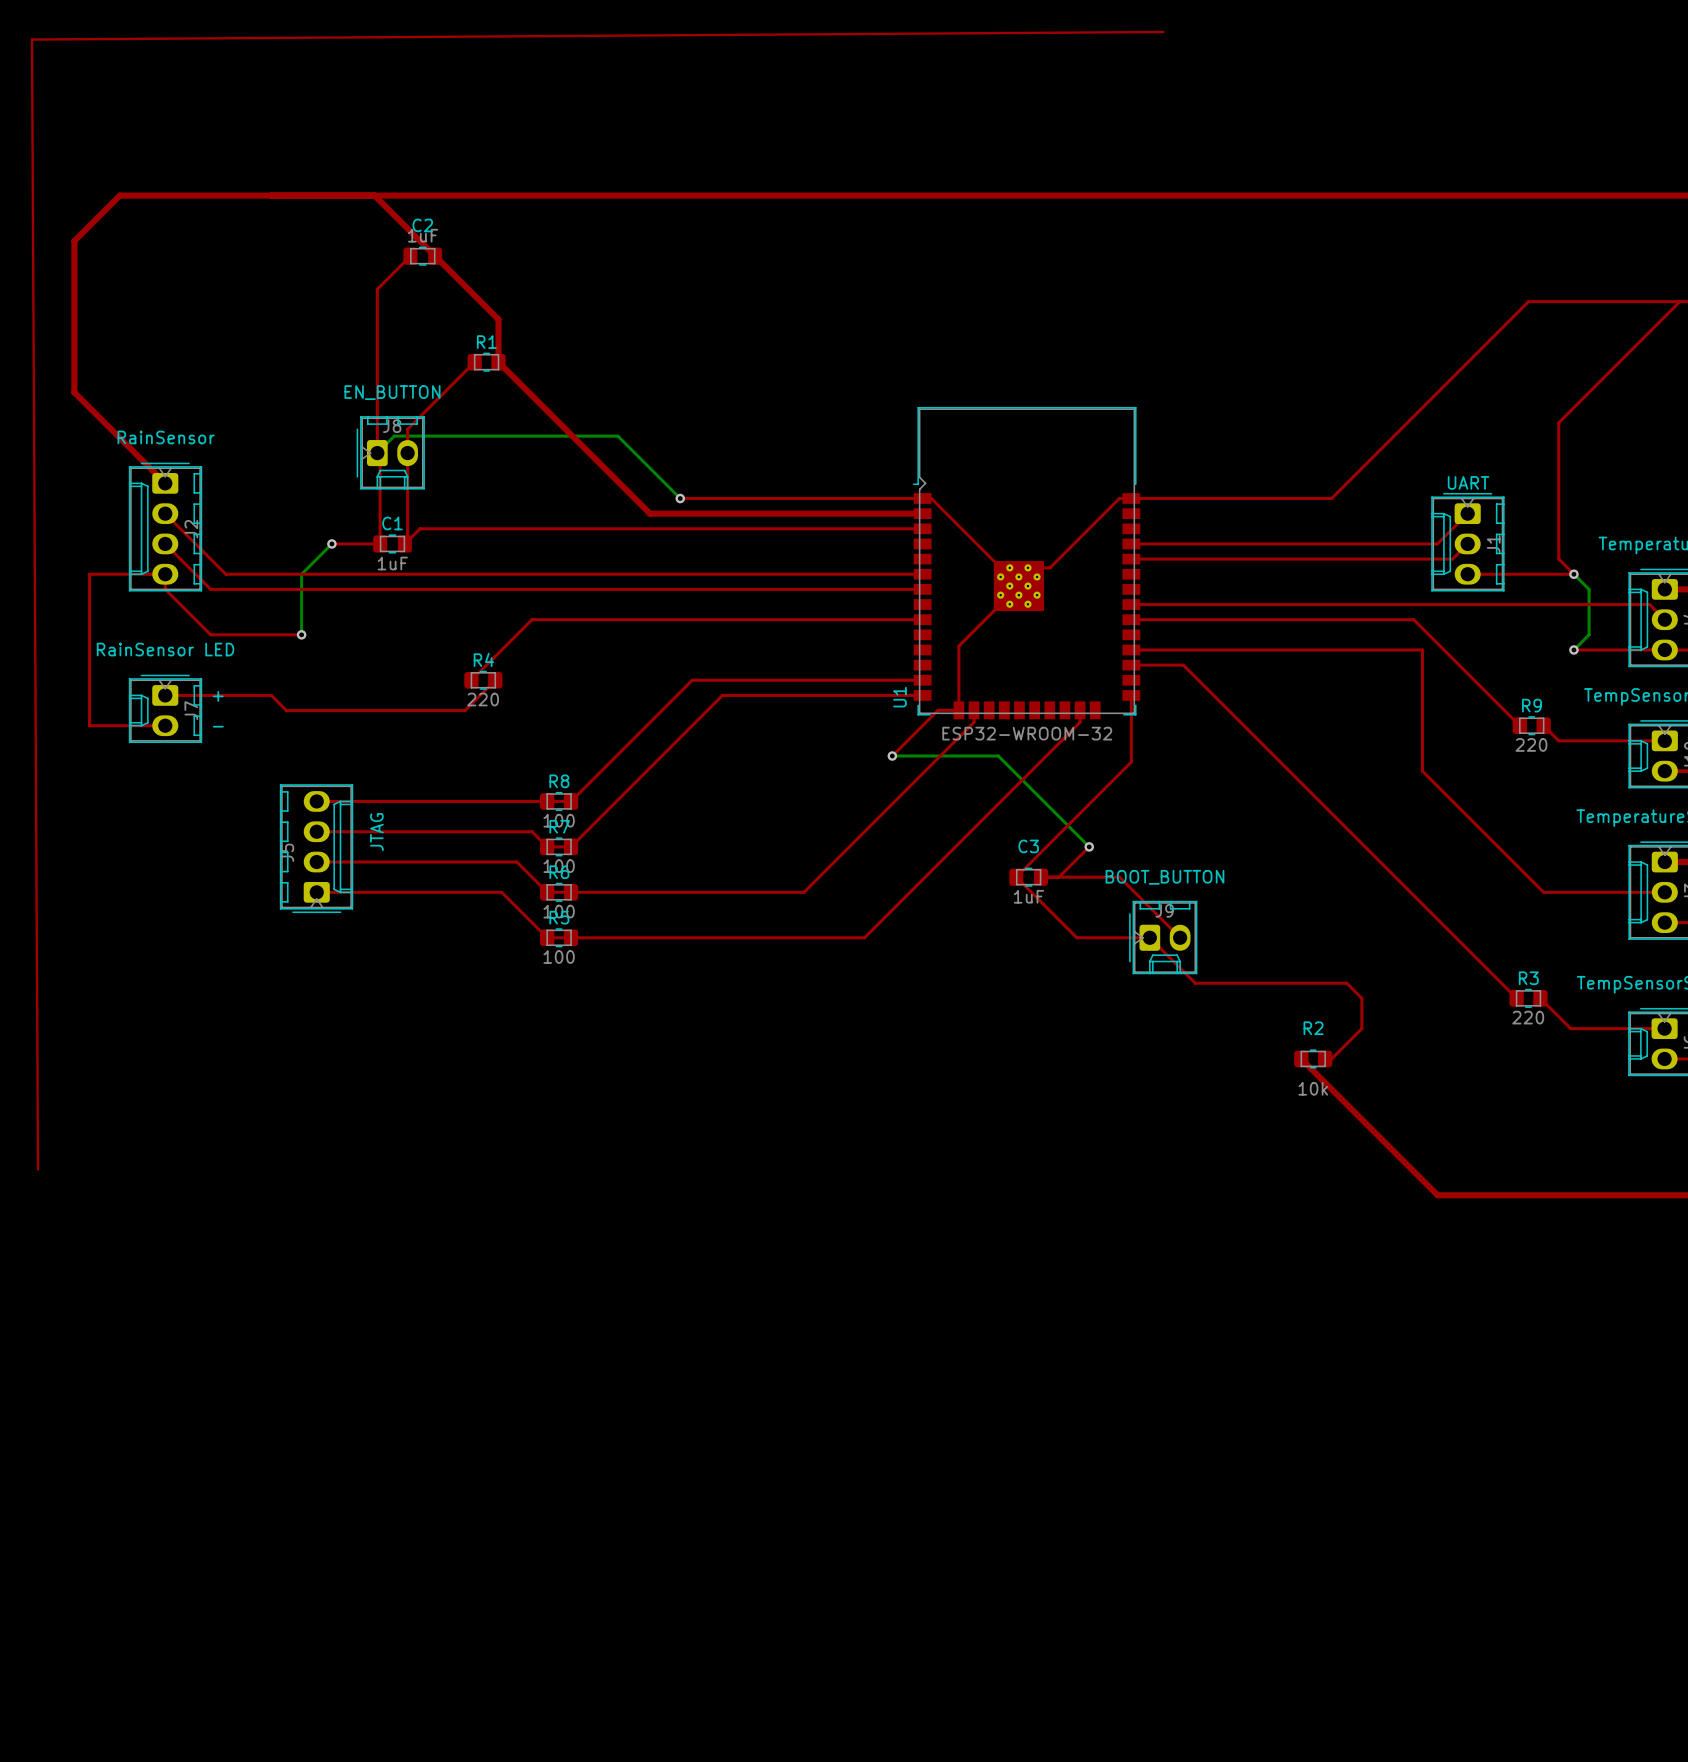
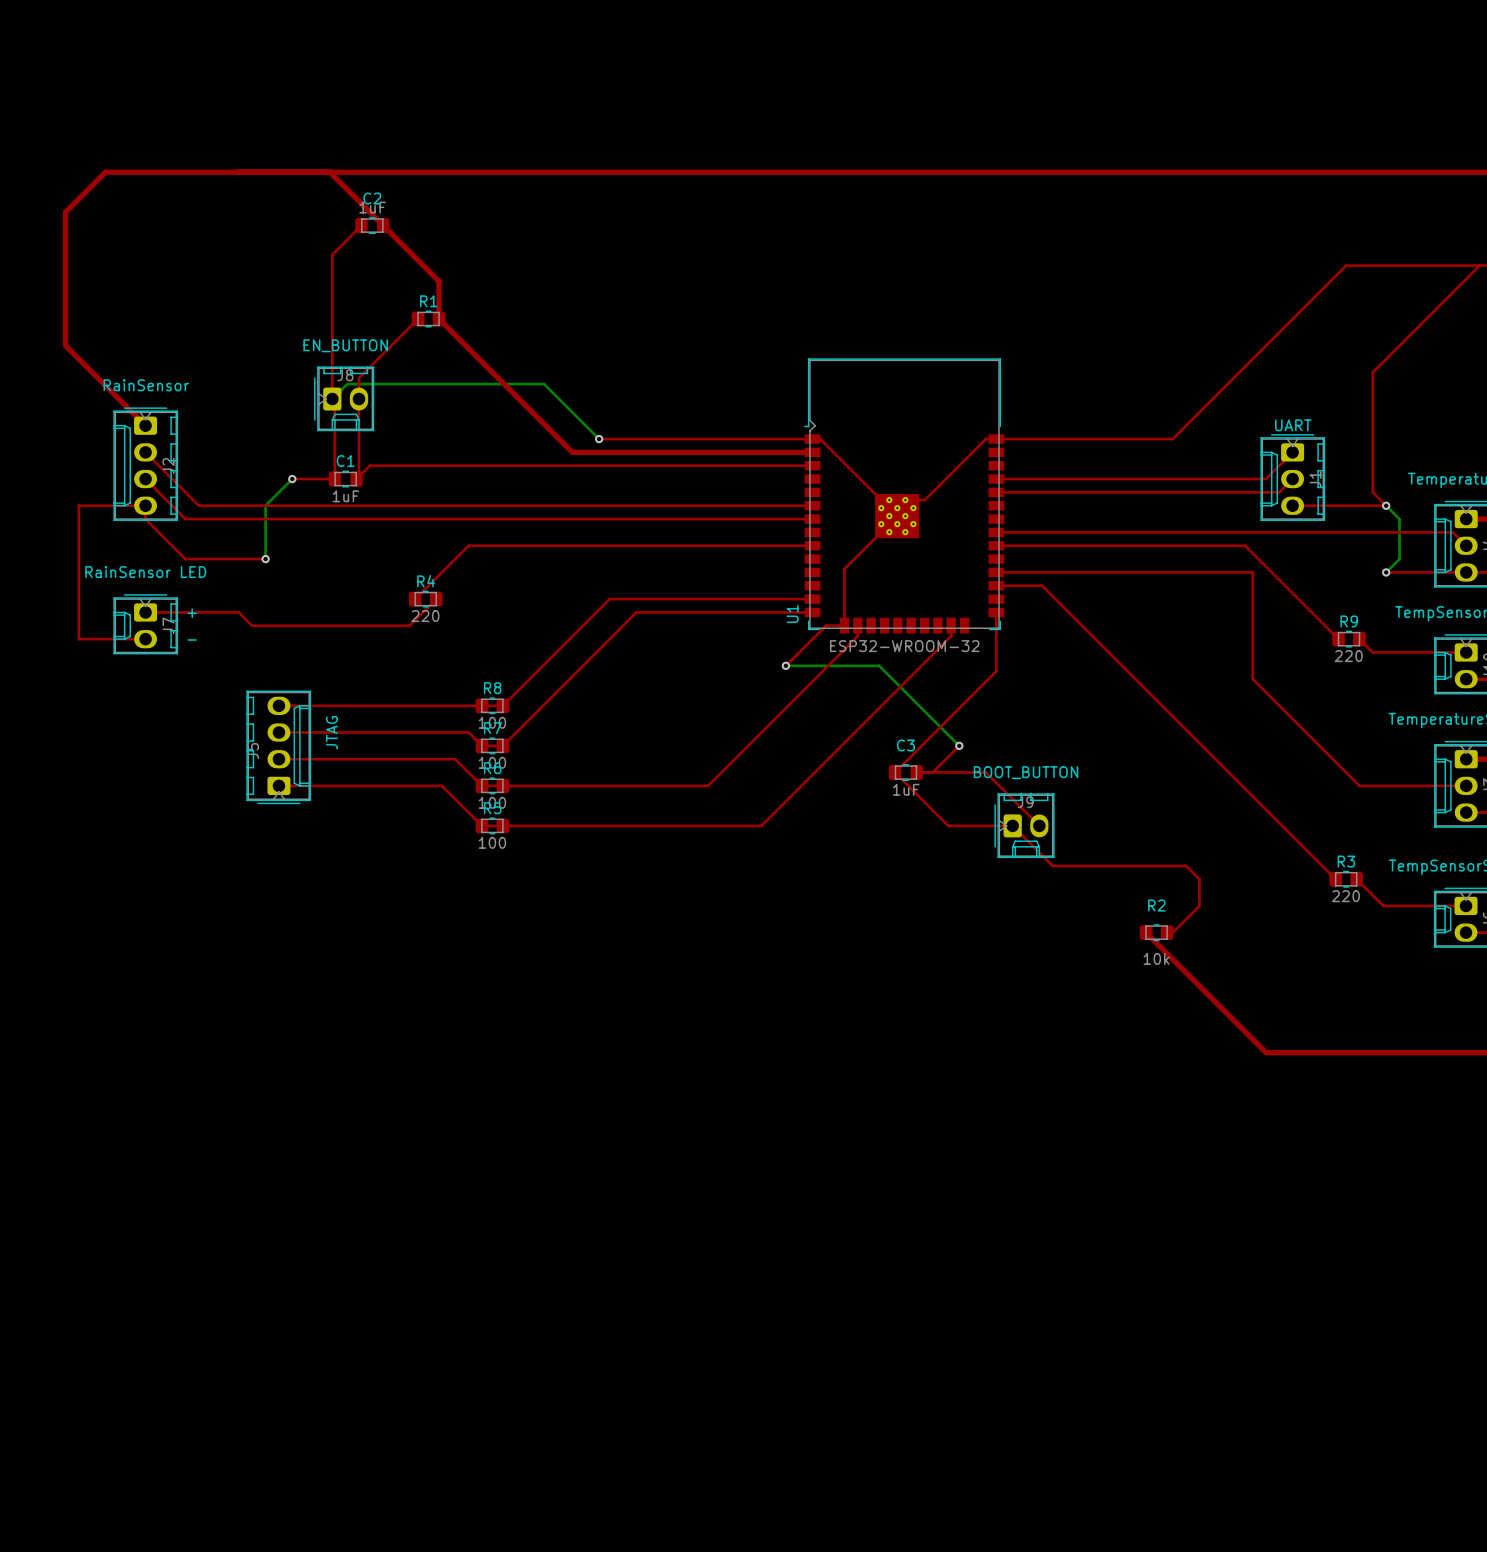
top track: (1163, 31) (31, 39) (38, 1169) -> none

